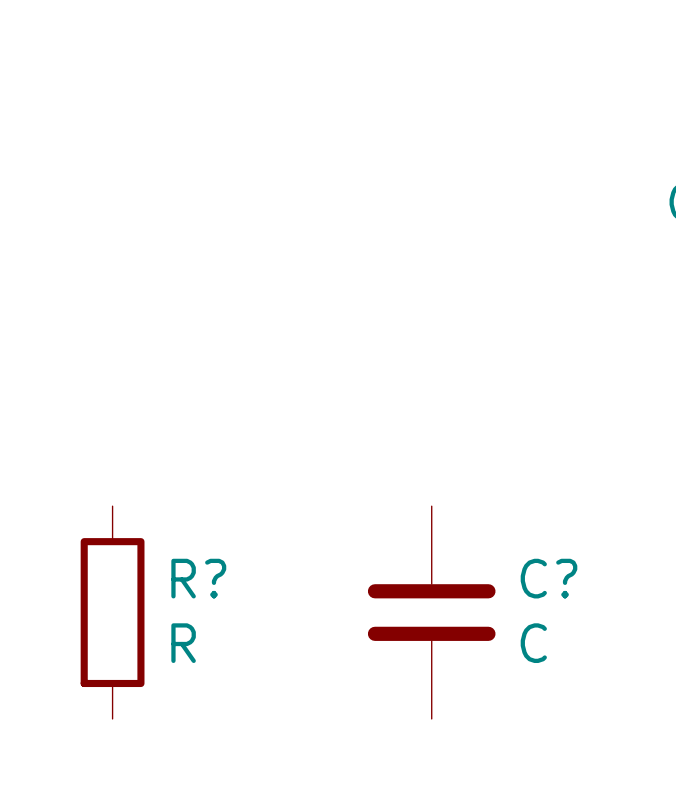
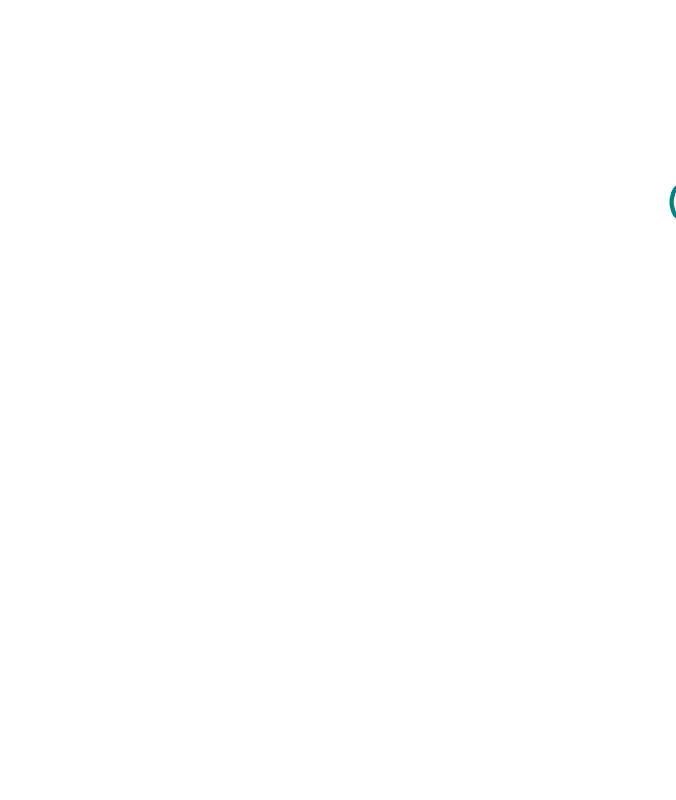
R?: R (112, 612) -> none
C?: C (431, 612) -> none

